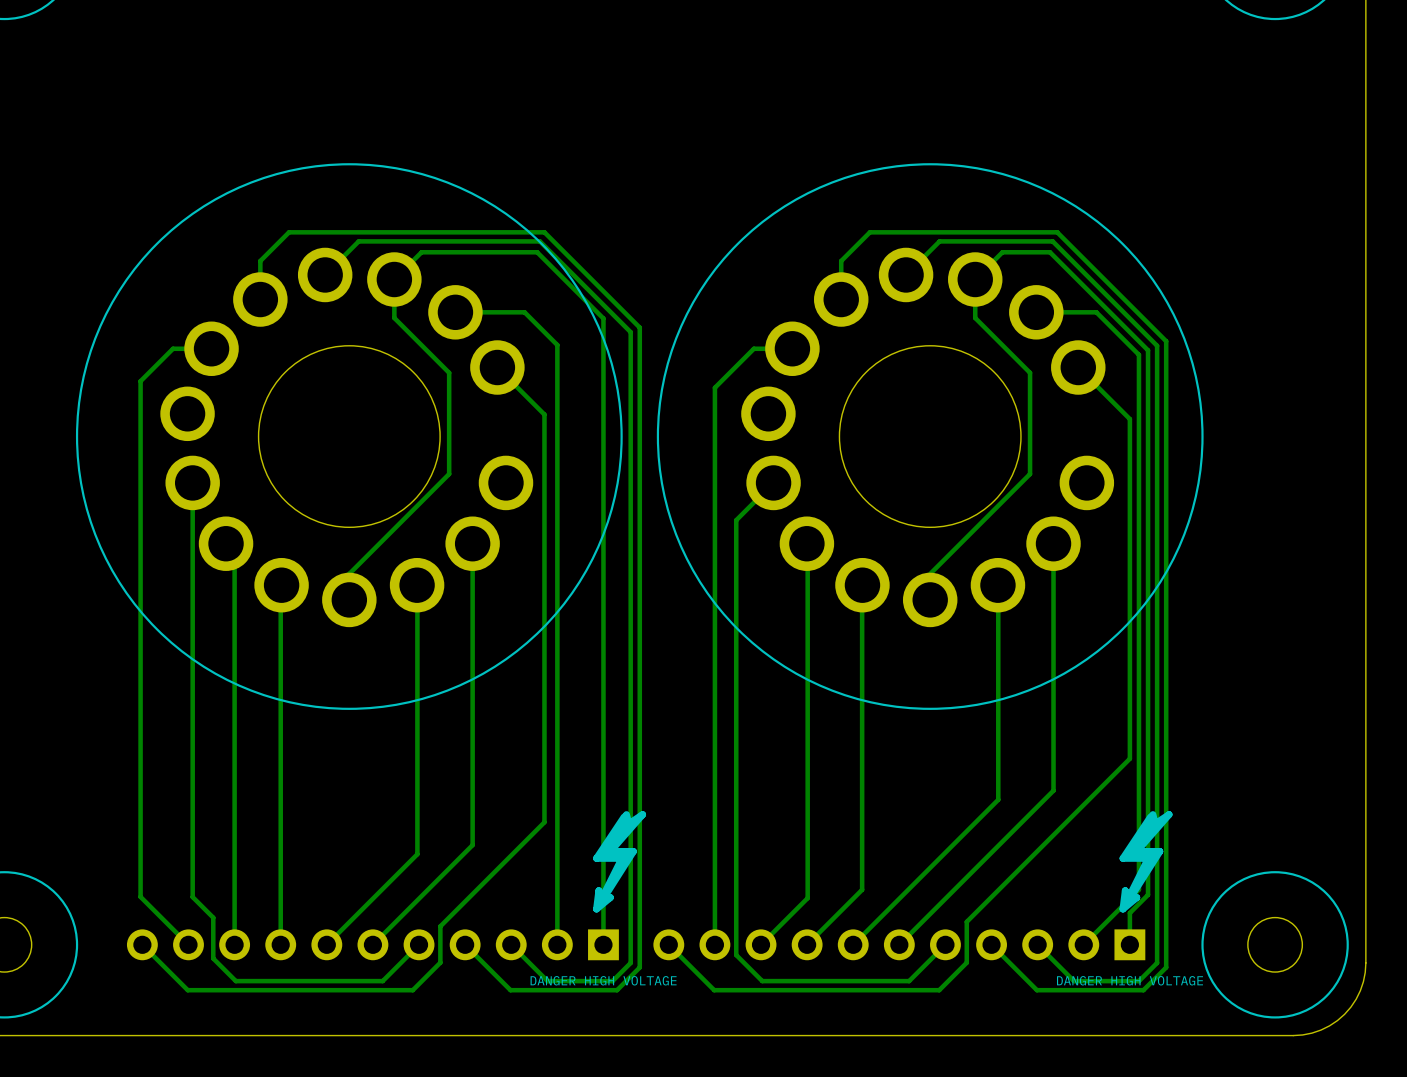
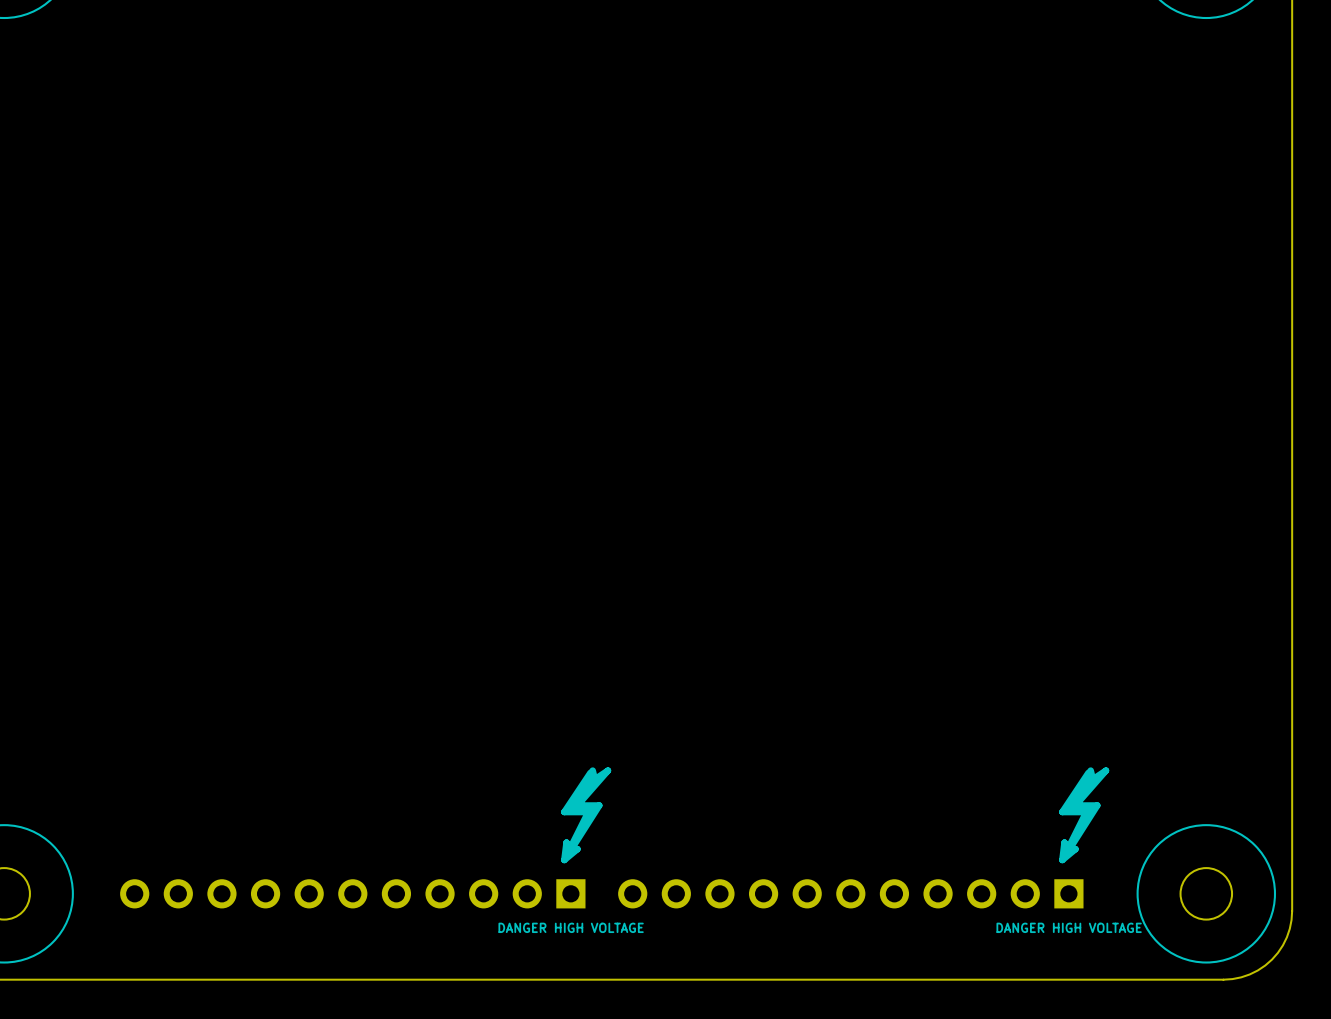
bottom track: (325, 274) (358, 241) (539, 241) (630, 332) (630, 962) (612, 981) (547, 981) (511, 944) -> none
bottom track: (906, 274) (939, 241) (1052, 241) (1157, 345) (1157, 962) (1138, 981) (1073, 981) (1037, 944) -> none
bottom track: (260, 299) (260, 261) (289, 232) (544, 232) (639, 327) (639, 967) (617, 990) (510, 990) (465, 944) -> none
bottom track: (841, 299) (841, 261) (869, 232) (1057, 232) (1166, 341) (1166, 967) (1143, 990) (1036, 990) (991, 944) -> none
bottom track: (455, 312) (524, 312) (557, 345) (557, 944) -> none
bottom track: (1036, 312) (1096, 312) (1138, 354) (1138, 889) (1083, 944) -> none
round board edge: [258, 345, 441, 528] -> none
round board edge: [838, 345, 1022, 528] -> none
bottom track: (211, 348) (173, 348) (140, 381) (140, 896) (188, 944) -> none
bottom track: (792, 348) (753, 348) (714, 387) (714, 944) -> none
bottom track: (497, 367) (544, 414) (544, 822) (440, 926) (440, 962) (412, 990) (187, 990) (142, 944) -> none
bottom track: (1078, 367) (1129, 419) (1129, 758) (966, 921) (966, 962) (939, 990) (714, 990) (668, 944) -> none
part: (349, 436) -> none
part: (930, 436) -> none
bottom track: (192, 482) (192, 897) (213, 917) (213, 958) (235, 981) (382, 981) (419, 944) -> none
bottom track: (773, 482) (736, 520) (736, 955) (762, 981) (909, 981) (945, 944) -> none
bottom track: (226, 543) (234, 552) (234, 944) -> none
bottom track: (472, 543) (472, 845) (372, 944) -> none
bottom track: (806, 543) (807, 898) (761, 944) -> none
bottom track: (1053, 543) (1053, 790) (899, 944) -> none
bottom track: (930, 573) (1030, 474) (1030, 372) (975, 318) (975, 279) (1002, 252) (1049, 252) (1148, 350) (1148, 894) (1129, 913) (1129, 944) -> none
bottom track: (281, 585) (280, 944) -> none
bottom track: (417, 585) (417, 854) (326, 944) -> none
bottom track: (862, 585) (862, 889) (807, 944) -> none
bottom track: (997, 585) (998, 799) (853, 944) -> none
bottom track: (349, 599) (349, 573) (449, 474) (449, 372) (394, 318) (394, 279) (421, 252) (537, 252) (603, 318) (603, 944) -> none

